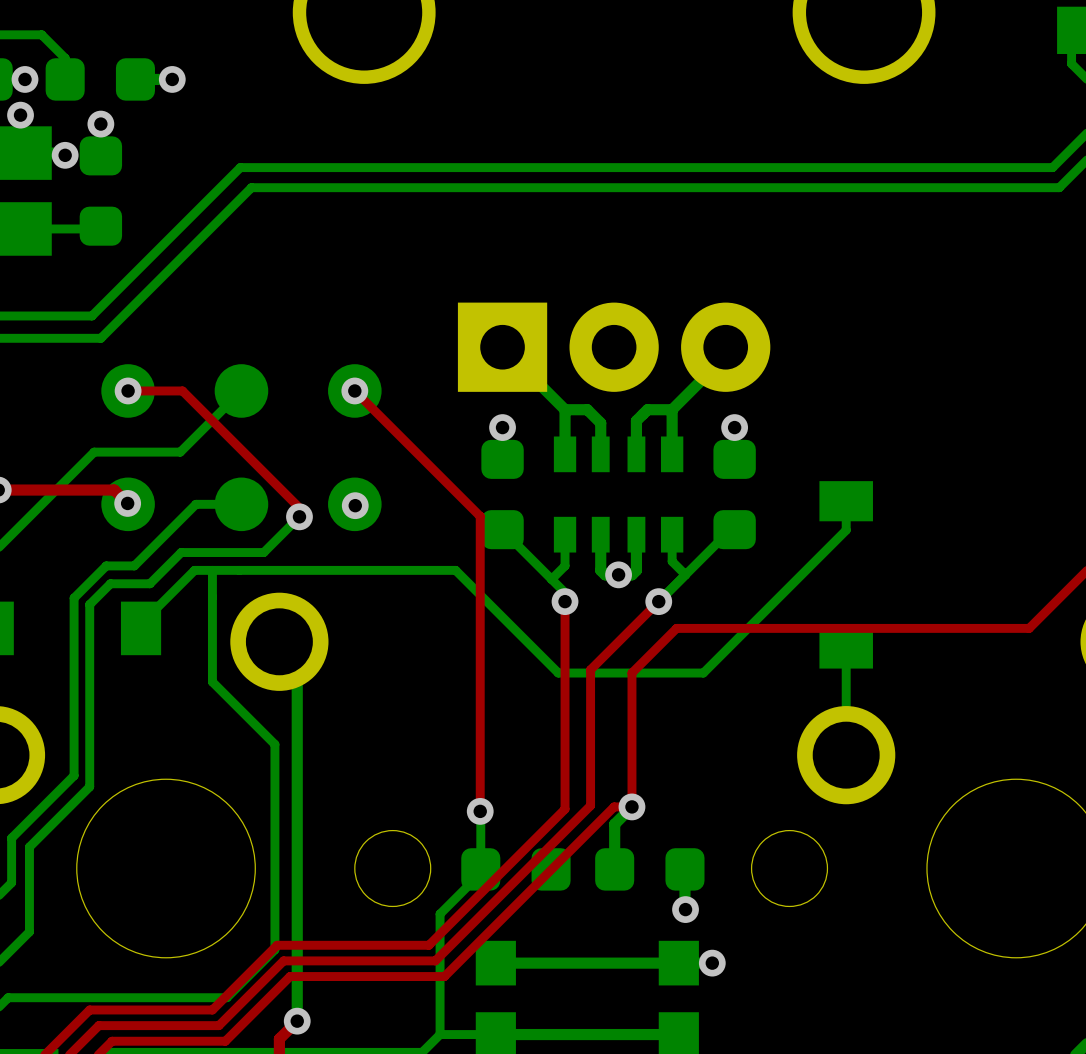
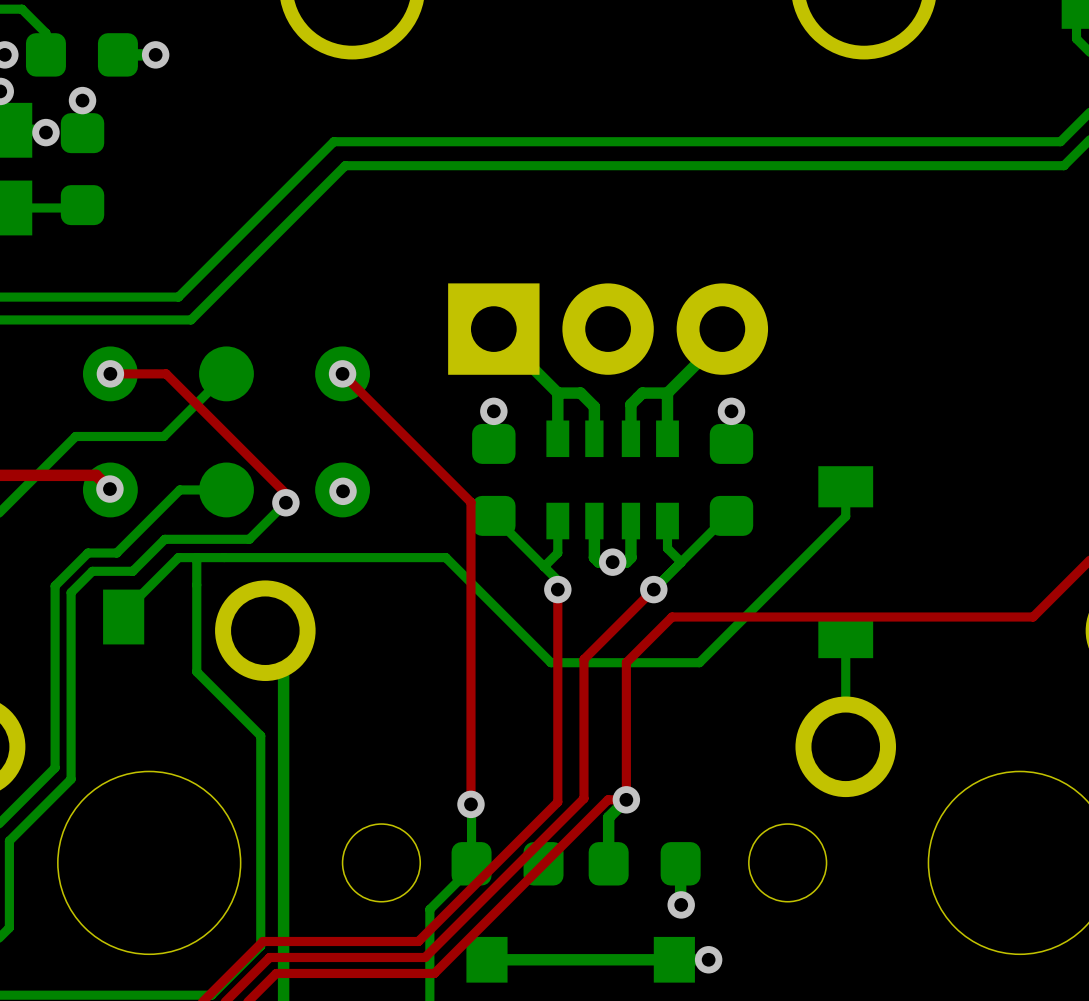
bottom track: (1055, 164) (1052, 167) (240, 167) (91, 315) -> (1060, 141) (333, 141) (178, 297) (73, 297)
bottom track: (357, 187) (251, 187) (100, 338) -> (345, 165) (191, 319) (82, 319)

